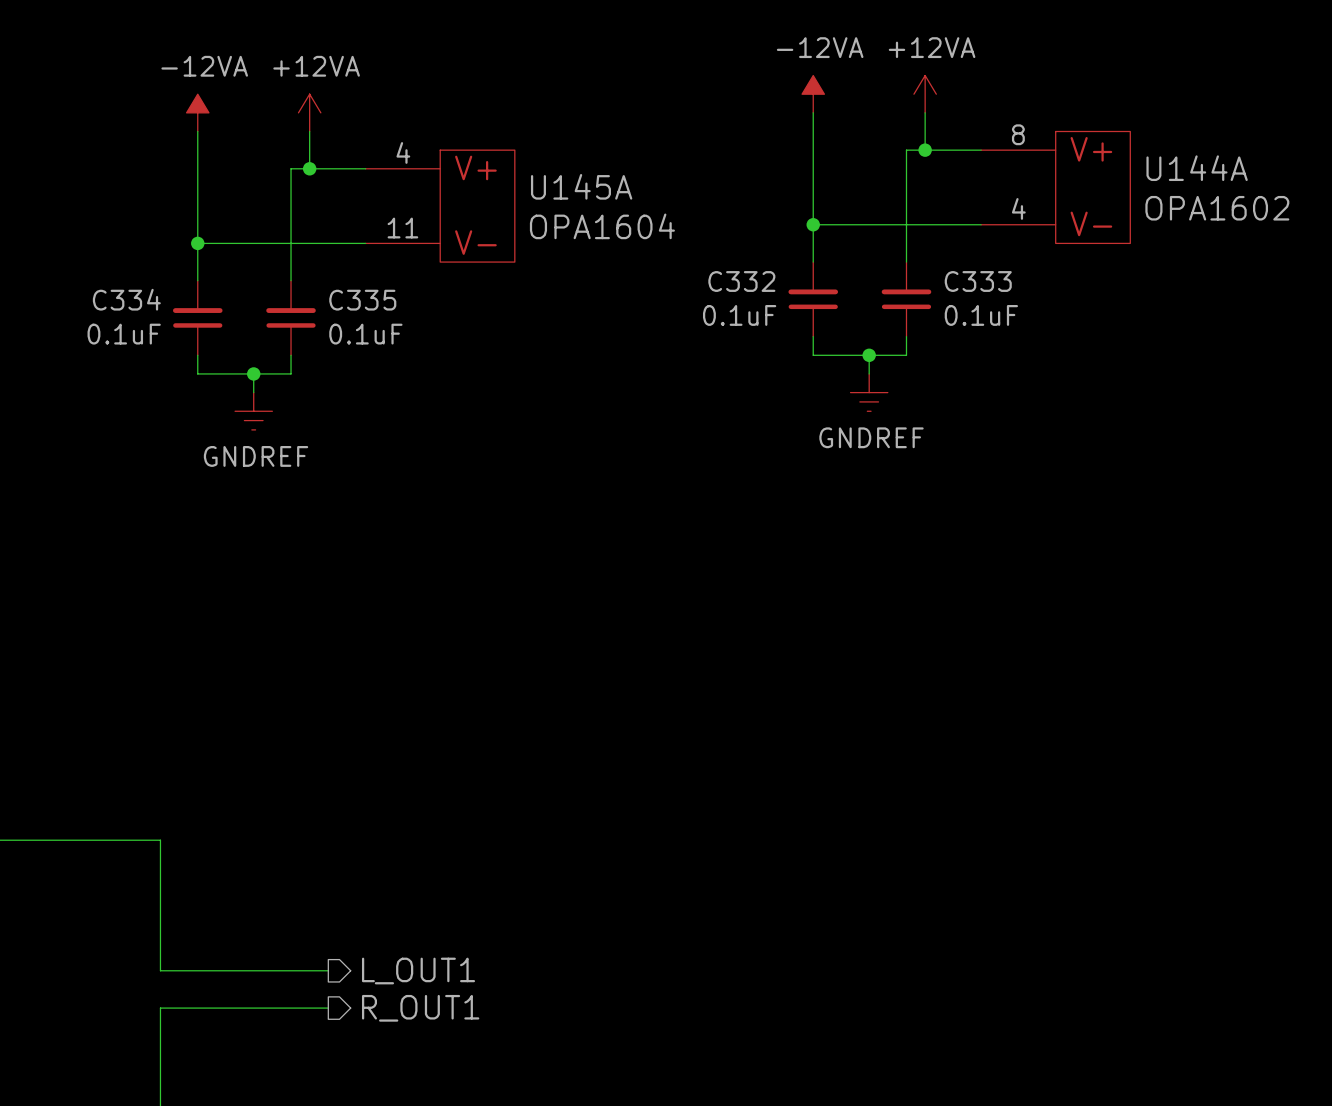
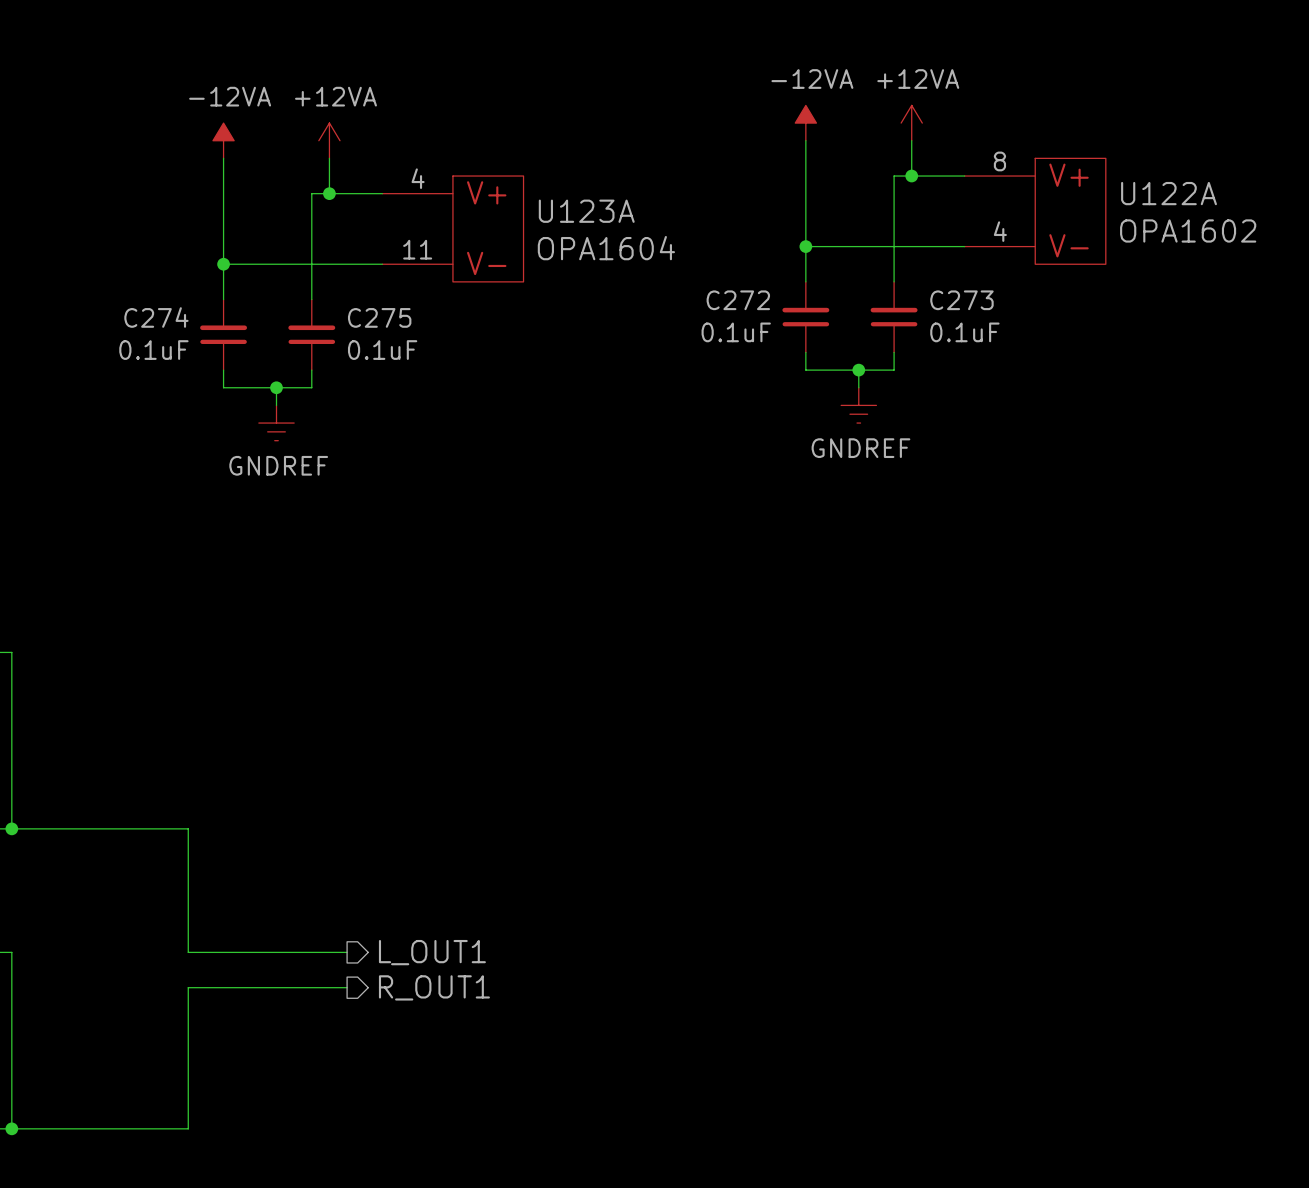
U144A name: U144A (1197, 168) -> U122A (1169, 193)
U145A name: U145A (581, 186) -> U123A (586, 211)
C332 name: C332 (741, 281) -> C272 (738, 300)
C333 name: C333 (978, 281) -> C273 (961, 300)
C334 name: C334 (126, 299) -> C274 (156, 317)
C335 name: C335 (362, 300) -> C275 (379, 317)

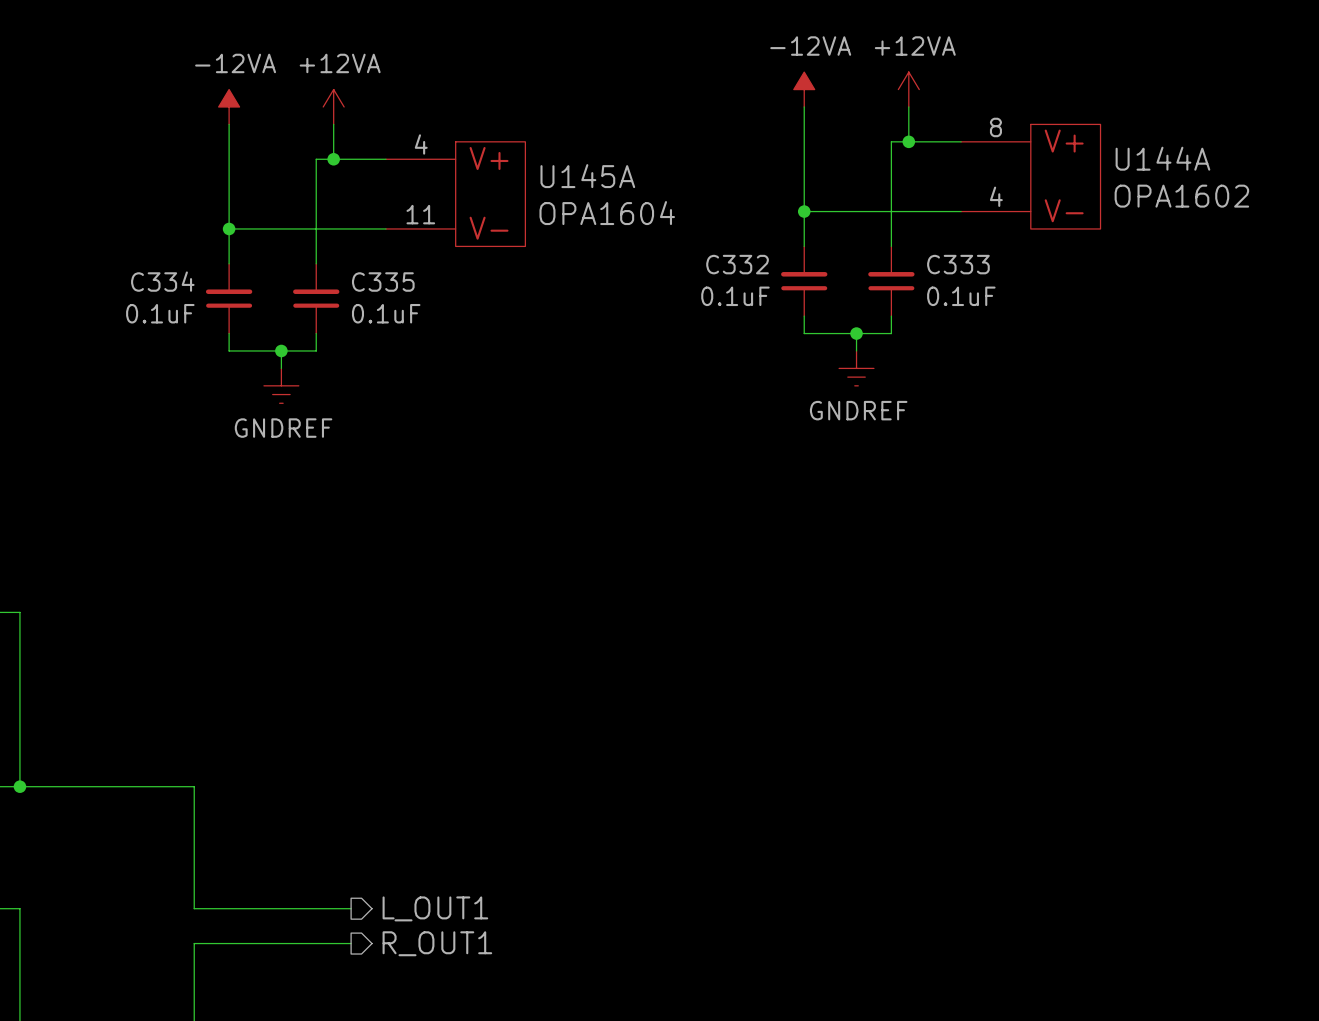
U122A name: U122A (1169, 193) -> U144A (1162, 158)
U123A name: U123A (586, 211) -> U145A (587, 176)
C272 name: C272 (738, 300) -> C332 (737, 264)
C273 name: C273 (961, 300) -> C333 (958, 264)
C274 name: C274 (156, 317) -> C334 (162, 281)
C275 name: C275 (379, 317) -> C335 (383, 282)

